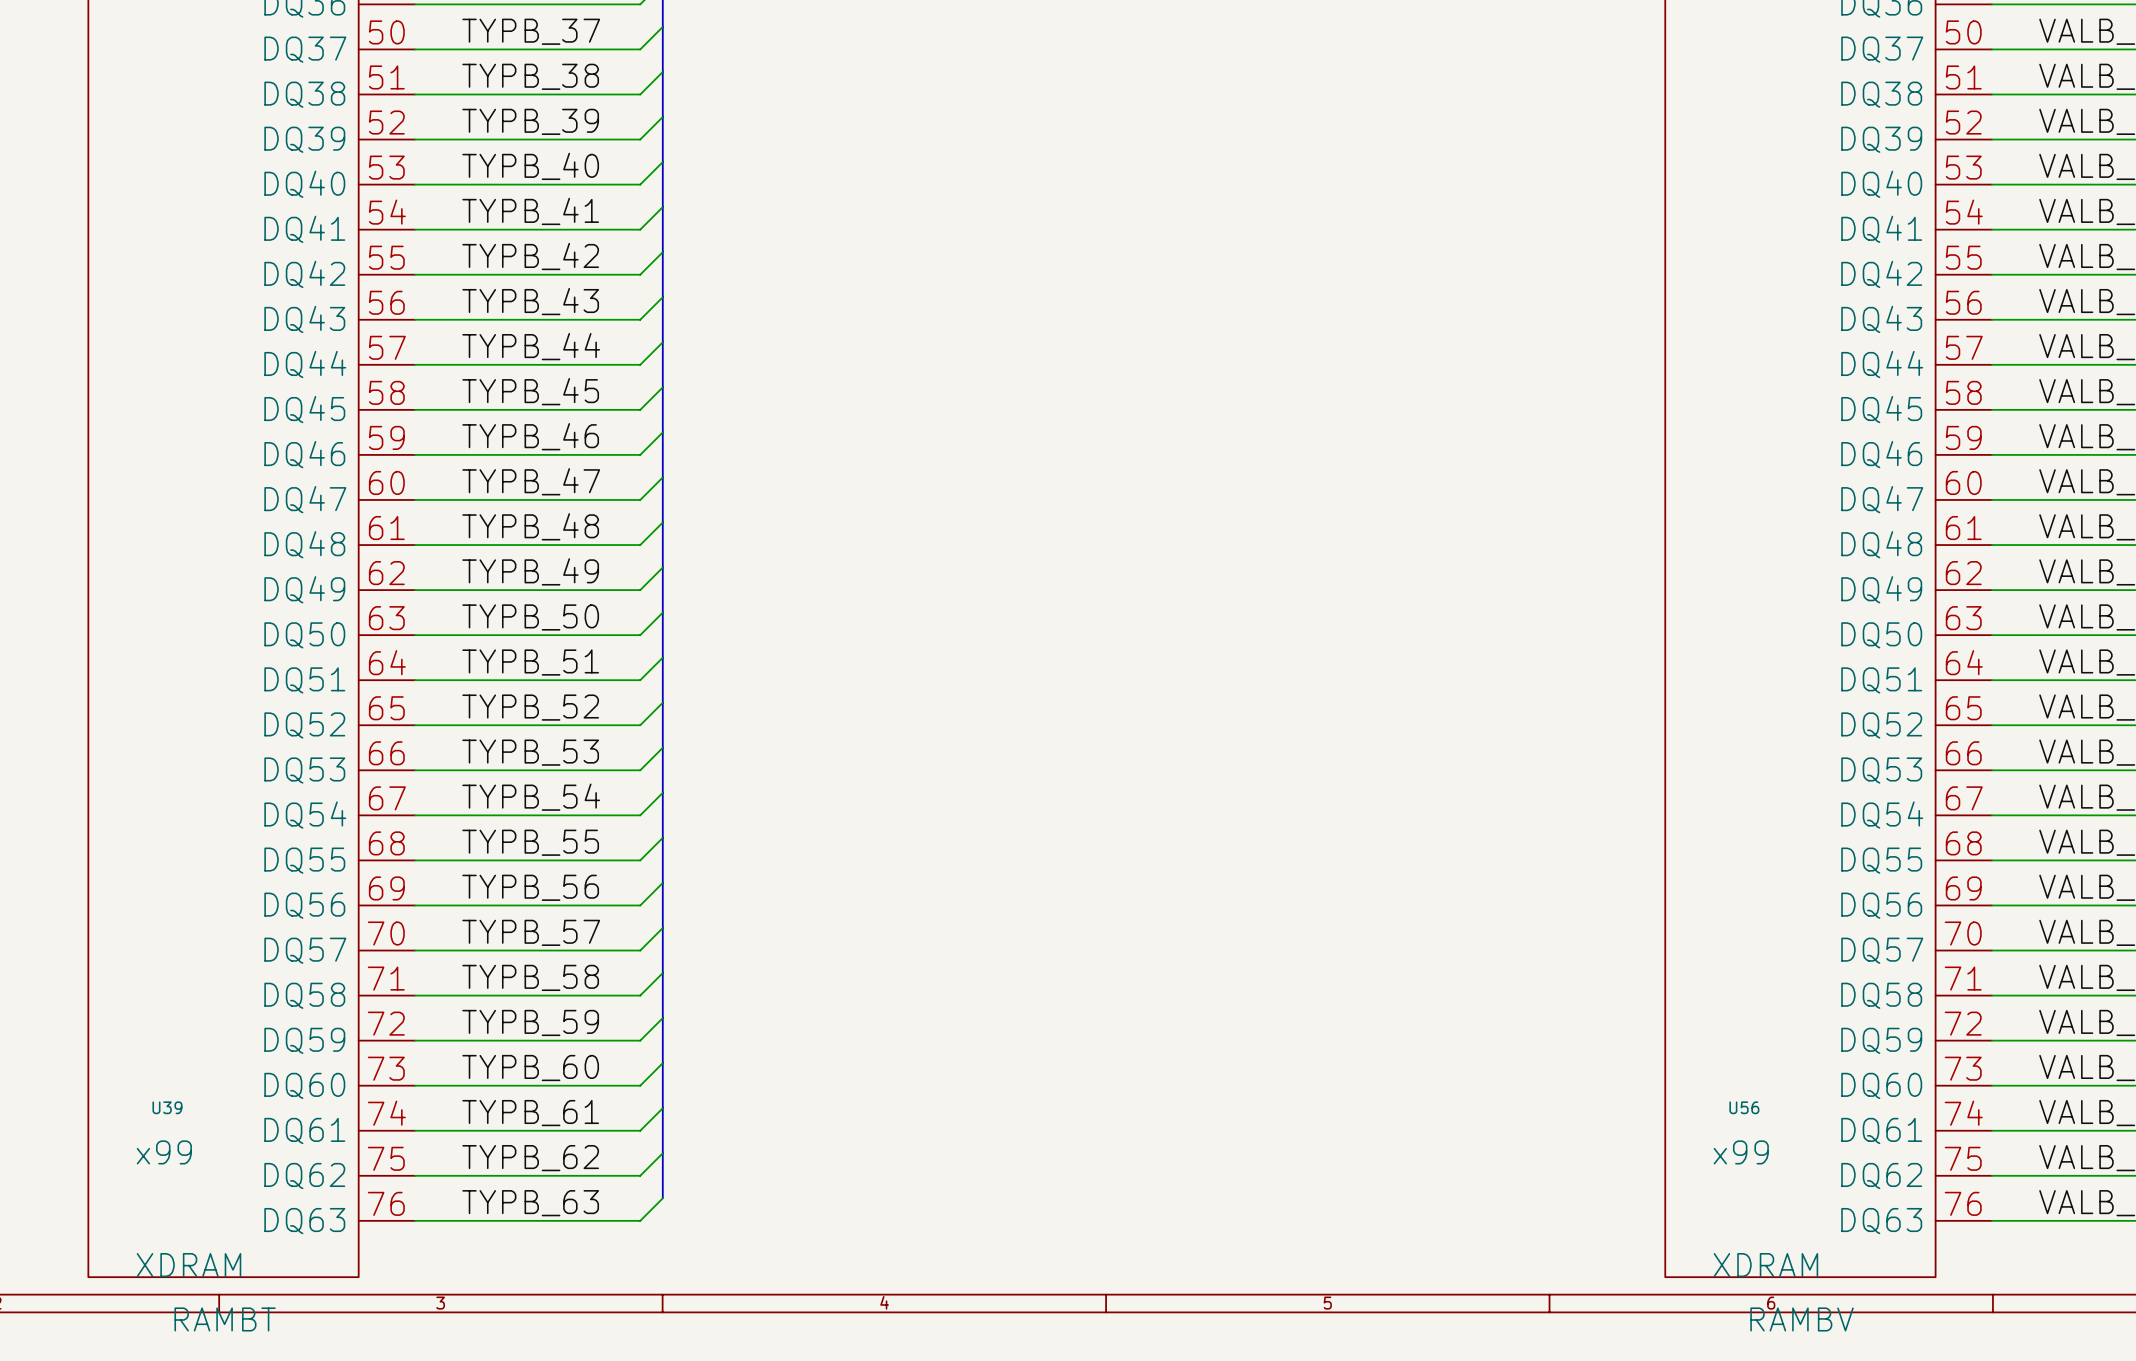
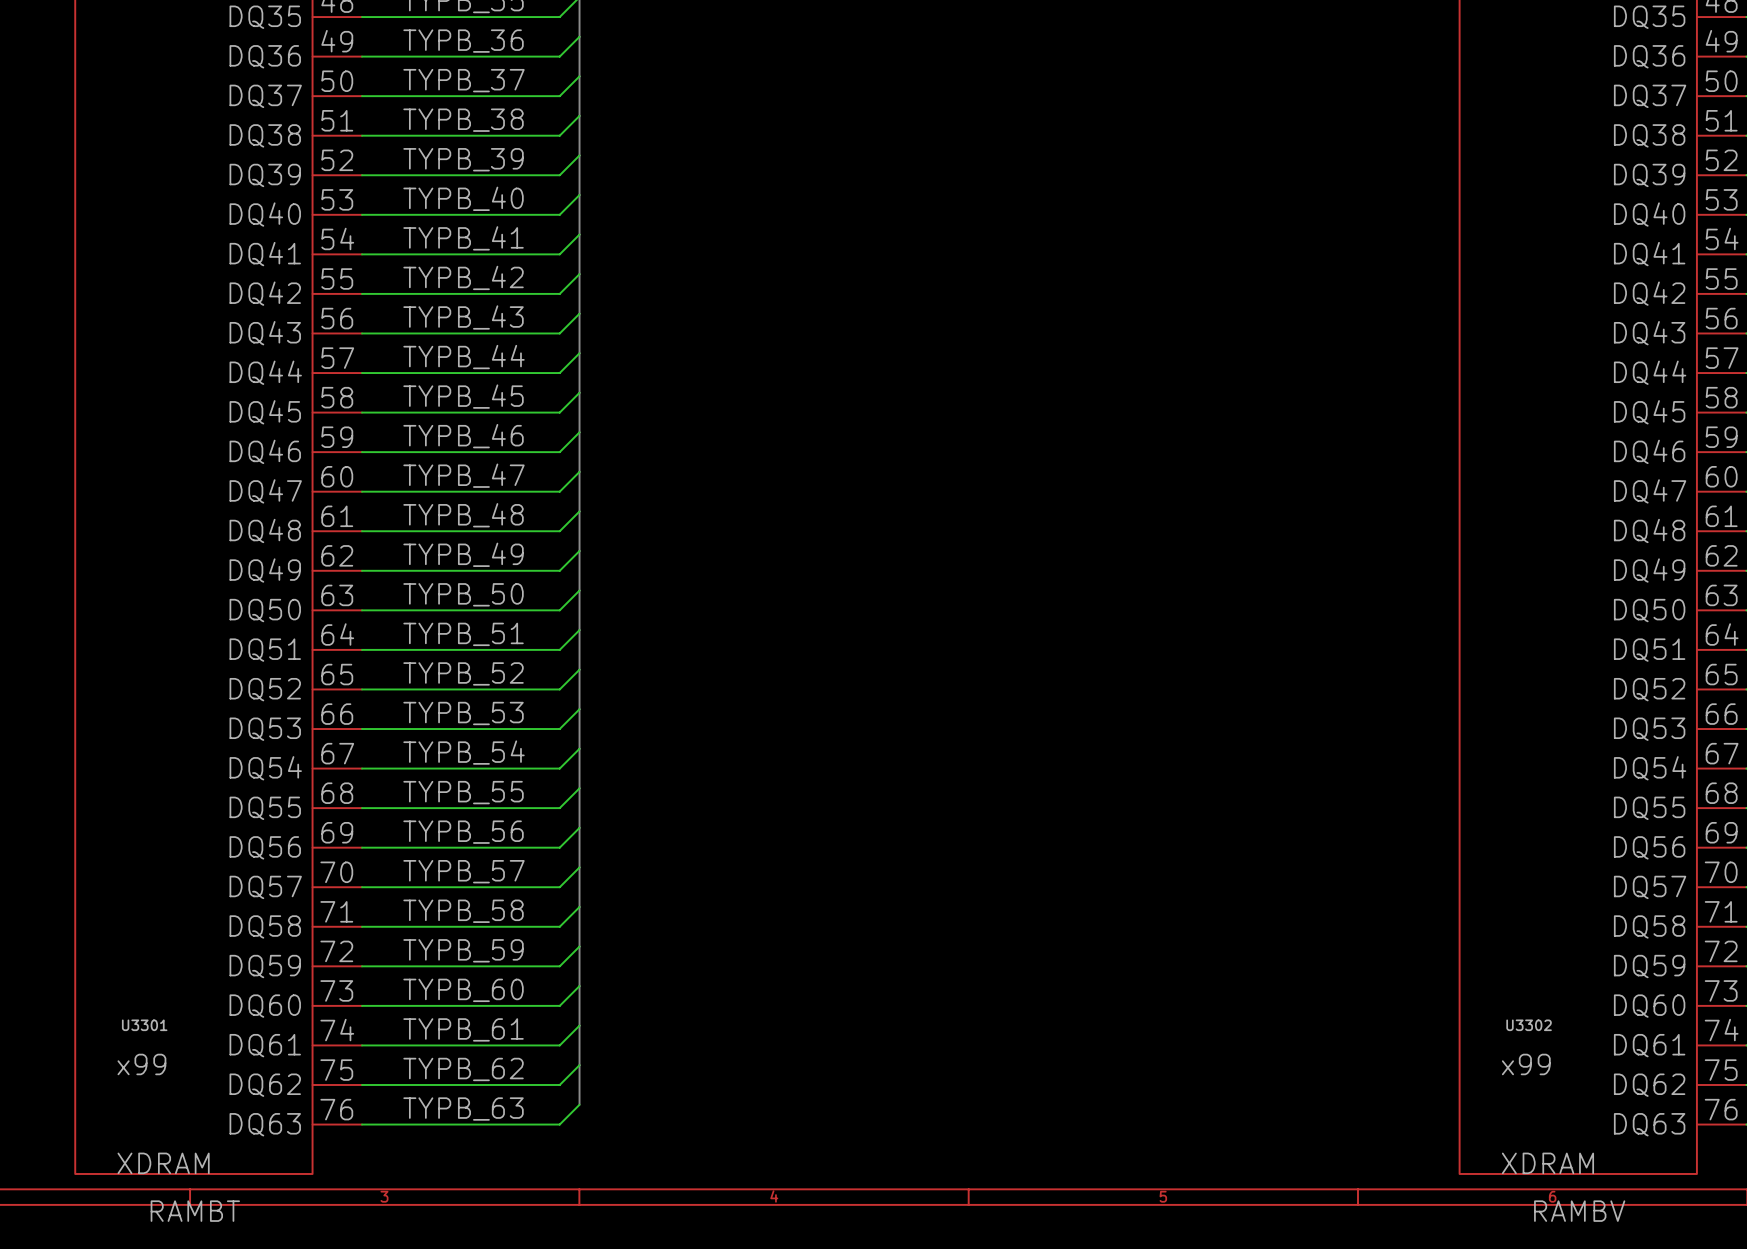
U39 name: U39 (167, 1107) -> U3301 (144, 1025)
U56 name: U56 (1744, 1107) -> U3302 (1529, 1025)

